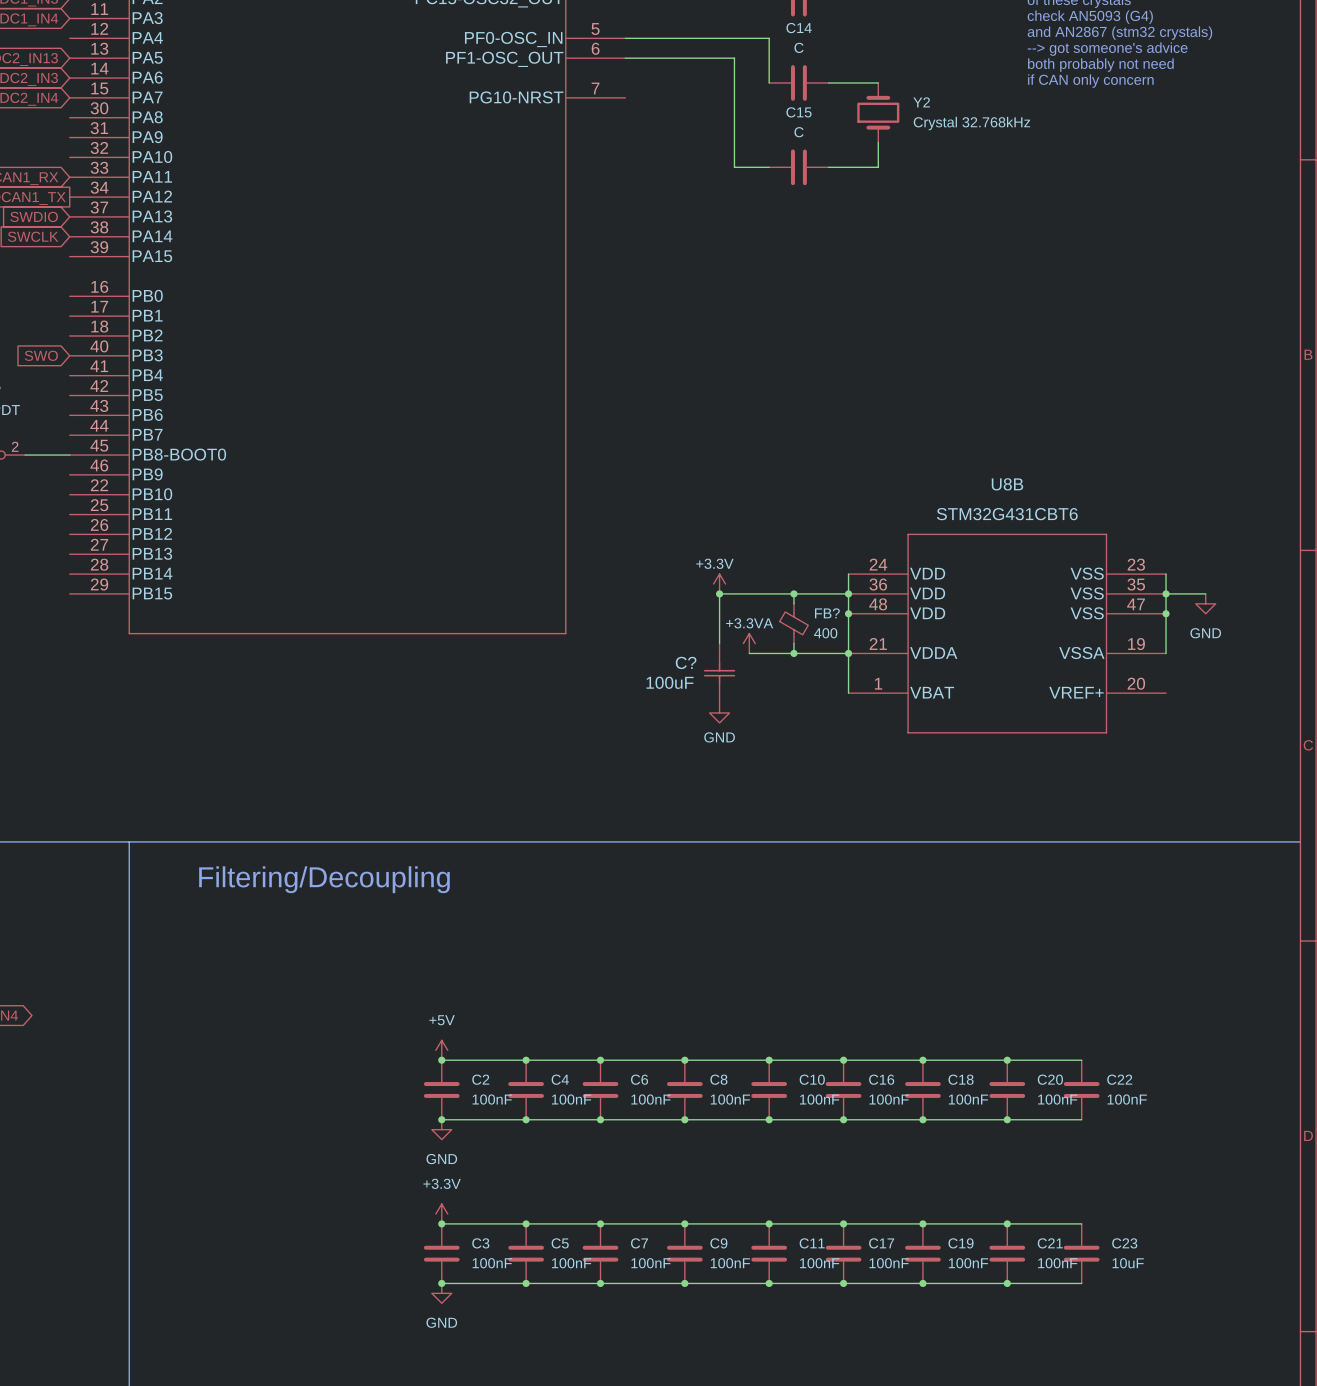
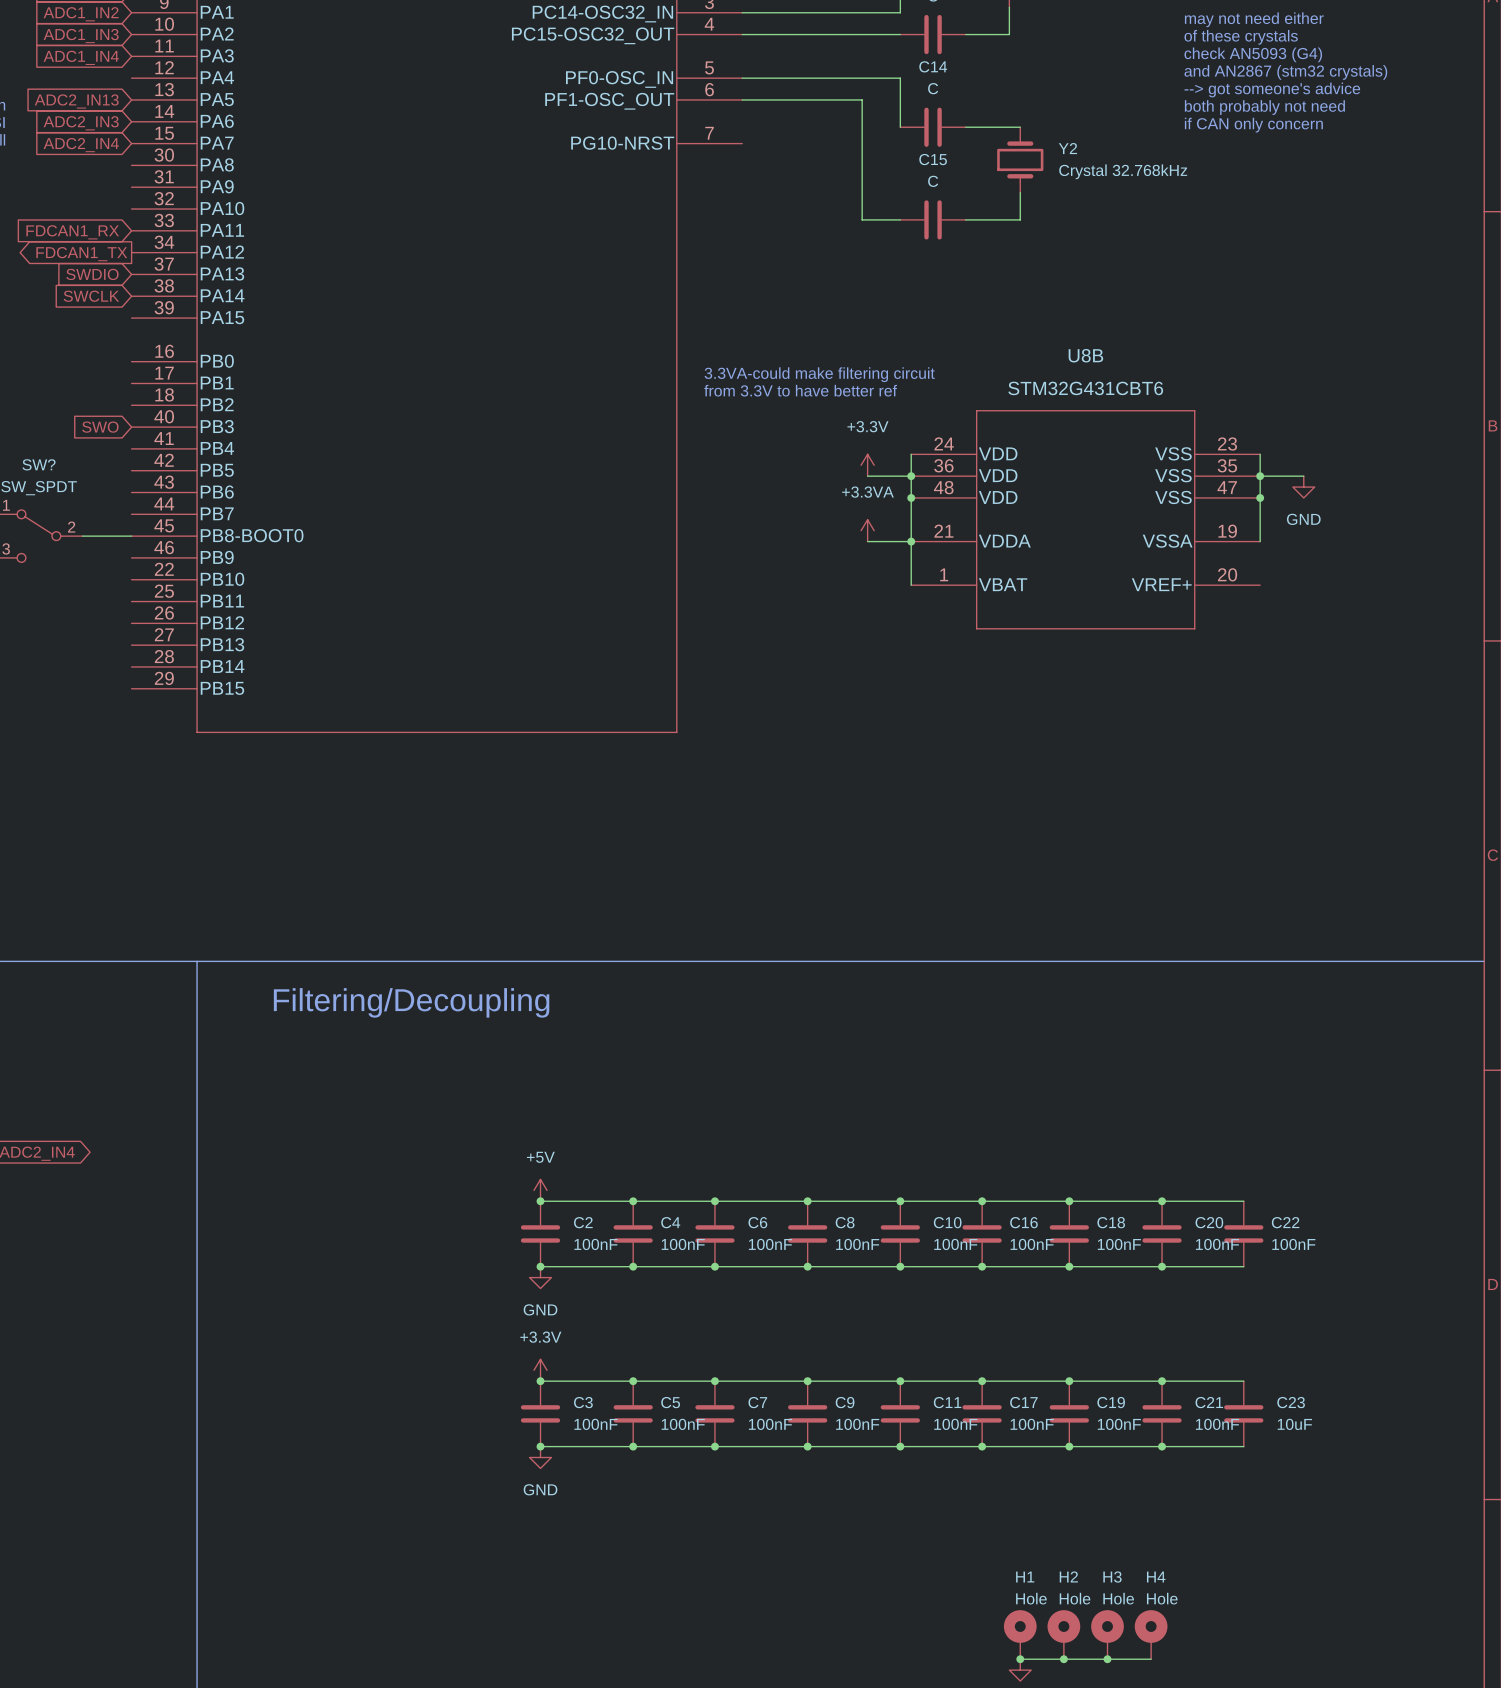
text: none -> 3.3VA-could make filtering circuit (819, 374)
text: none -> from 3.3V to have better ref (800, 390)
wire: none -> (911, 454) (911, 585)
wire: none -> (1260, 454) (1260, 541)
wire: none -> (867, 476) (911, 476)
junction: none -> (911, 476)
wire: none -> (1260, 476) (1303, 476)
junction: none -> (1260, 476)
power symbol: none -> GND (1303, 487)
junction: none -> (911, 497)
junction: none -> (1260, 497)
wire: none -> (867, 541) (911, 541)
junction: none -> (911, 541)
power symbol text position: +3.3V (714, 563) -> +3.3V (867, 426)
wire: (848, 574) (848, 693) -> none
wire: (1166, 574) (1166, 653) -> none
power symbol position: +3.3V (719, 584) -> +3.3V (867, 465)
junction: (719, 593) -> none
wire: (793, 593) (793, 603) -> none
junction: (793, 593) -> none
wire: (848, 593) (719, 593) (719, 643) -> none
junction: (848, 593) -> none
wire: (1166, 593) (1205, 593) -> none
junction: (1166, 593) -> none
power symbol: GND (1205, 603) -> none
junction: (848, 613) -> none
junction: (1166, 613) -> none
power symbol text position: +3.3VA (749, 623) -> +3.3VA (867, 492)
FB?: 400 (793, 623) -> none
U8B position: (1007, 633) -> (1085, 519)
power symbol position: +3.3VA (749, 643) -> +3.3VA (867, 530)
wire: (793, 643) (793, 653) -> none
wire: (749, 653) (848, 653) -> none
junction: (793, 653) -> none
junction: (848, 653) -> none
C?: 100uF (719, 673) -> none
power symbol: GND (719, 712) -> none

